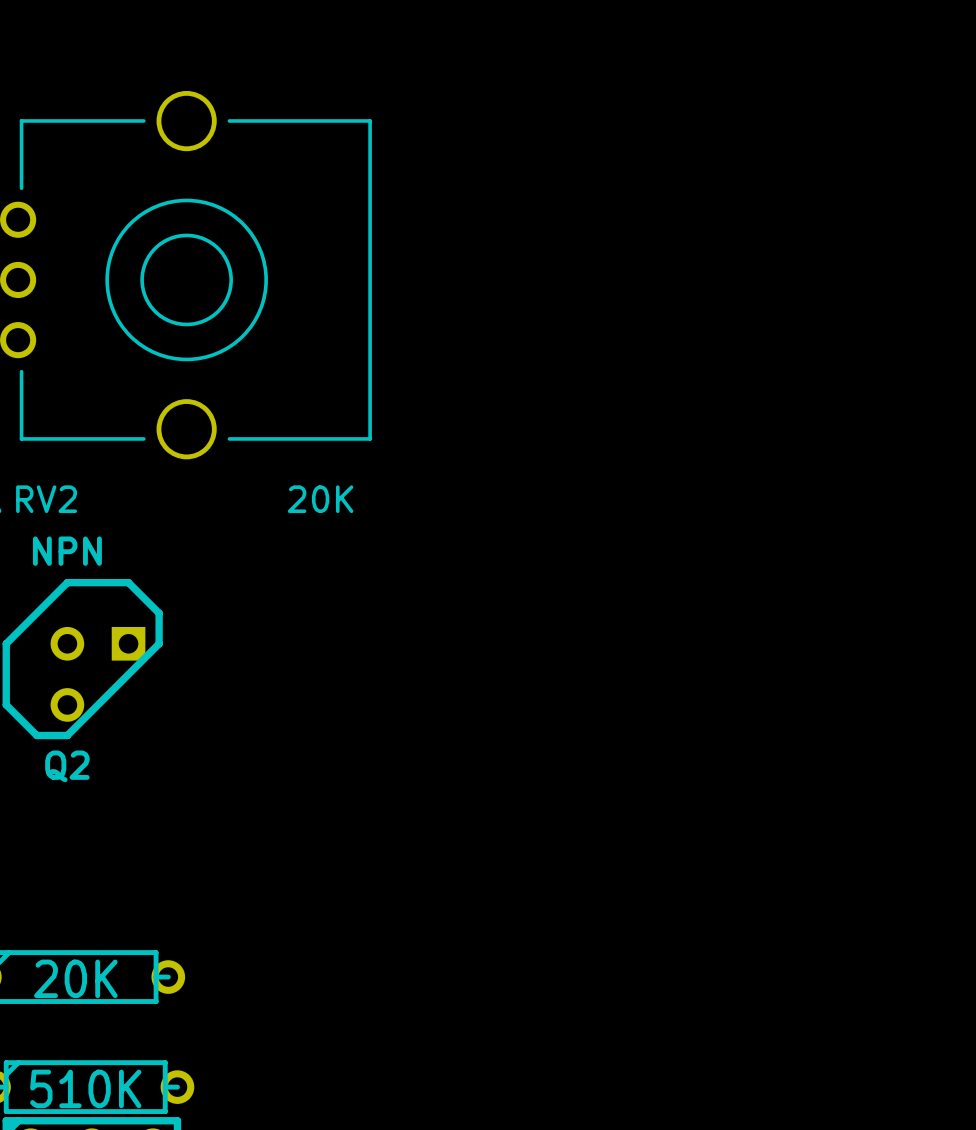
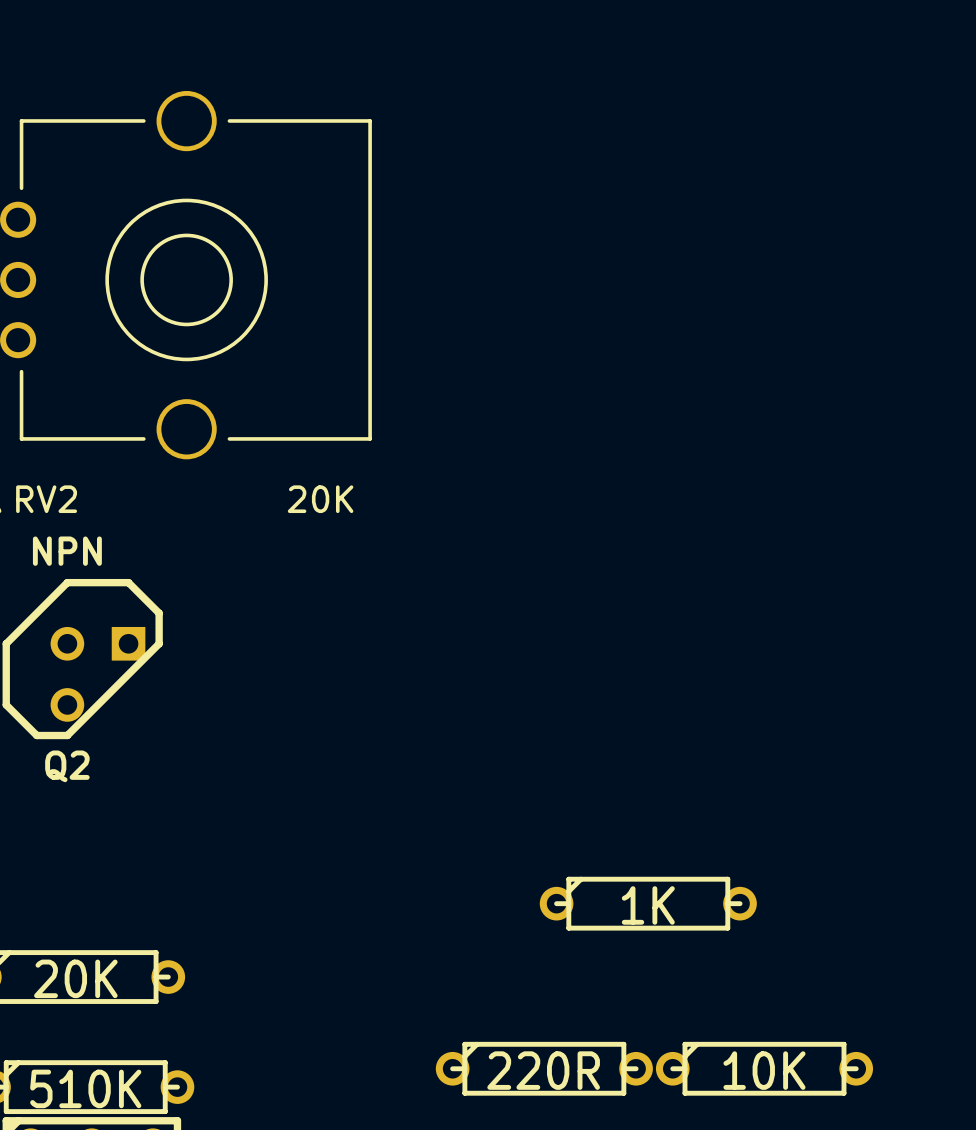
part: none -> 1K (648, 903)
part: none -> 220R (544, 1068)
part: none -> 10K (764, 1068)

